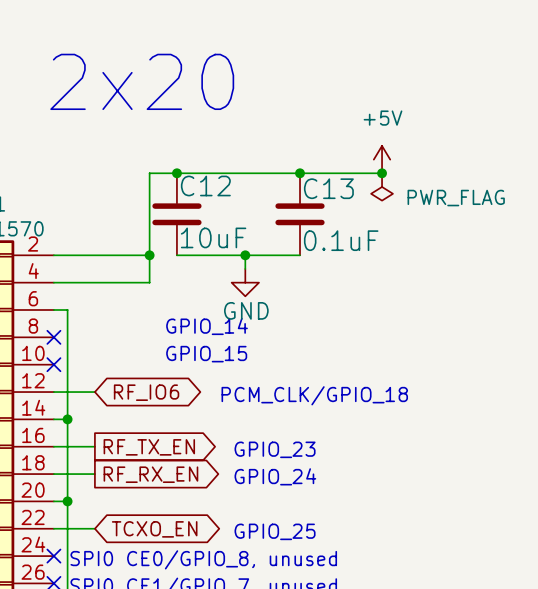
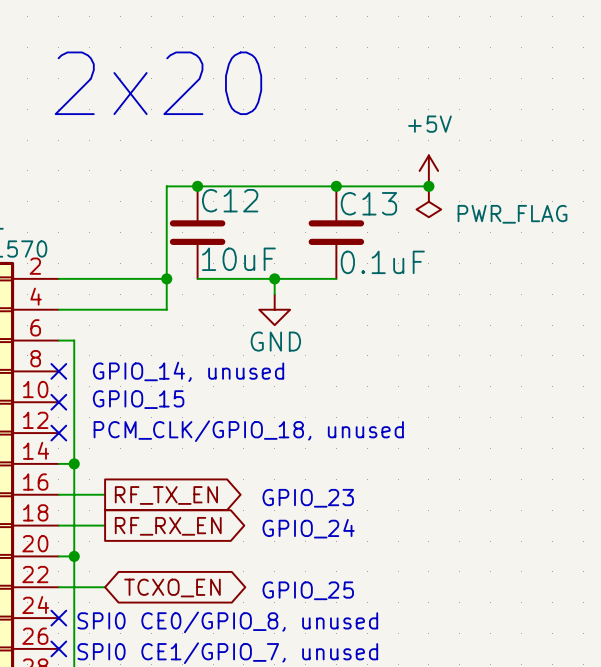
text: GPIO_14 (207, 326) -> GPIO_14, unused (188, 371)
text position: GPIO_15 (206, 354) -> GPIO_15 (138, 399)
wire: (53, 392) (94, 392) -> none
no-connect mark: none -> (58, 433)
global label: RF_IO6 (146, 392) -> none
text: PCM_CLK/GPIO_18 (314, 395) -> PCM_CLK/GPIO_18, unused (248, 431)

